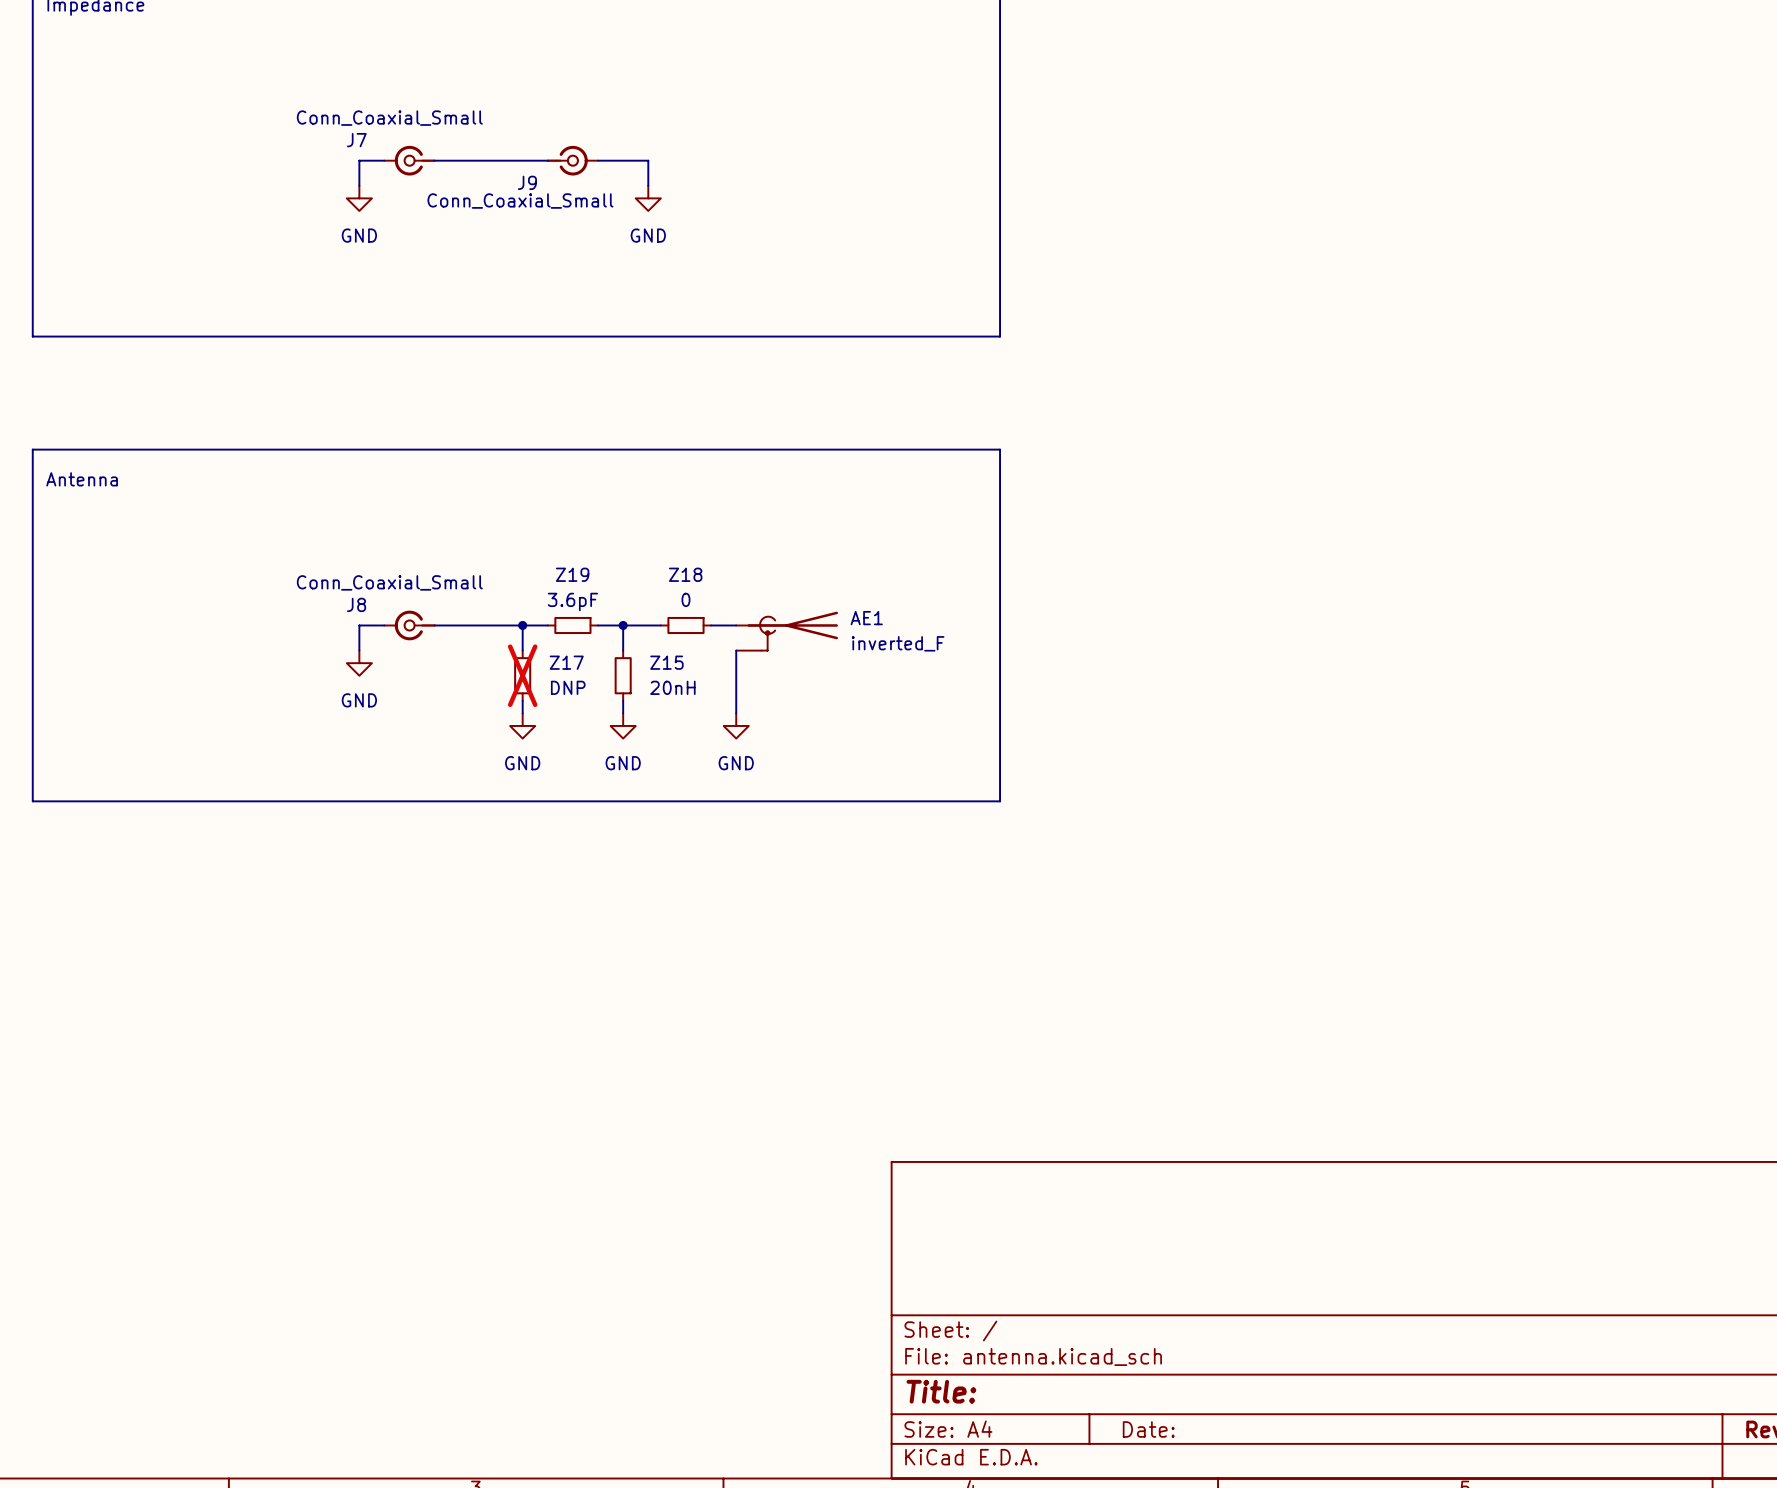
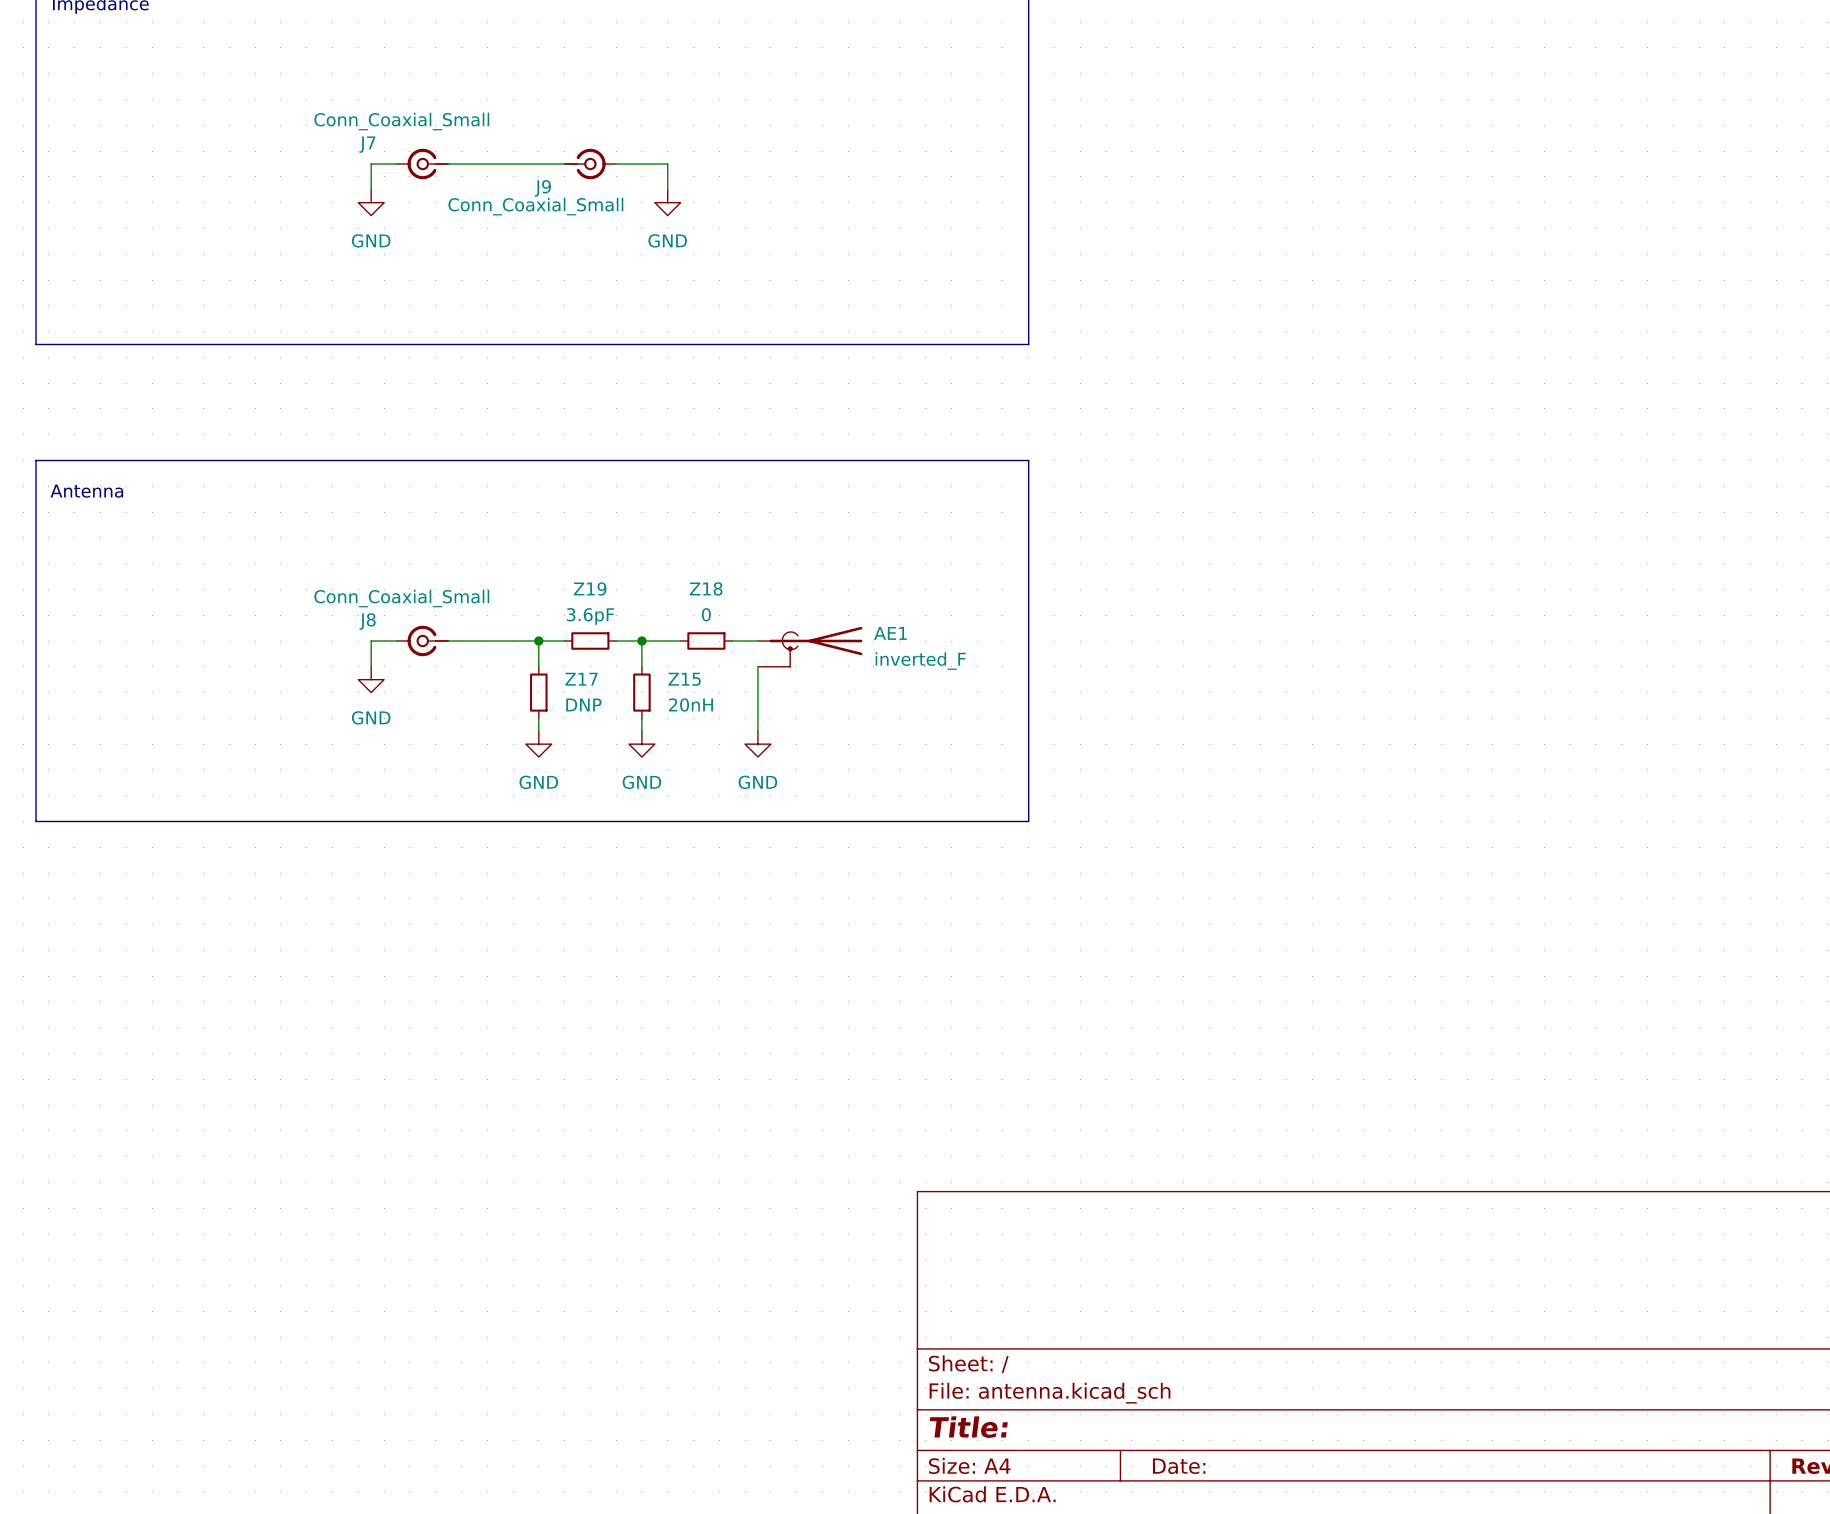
Z17 do-not-place cross: (522, 675) -> none

